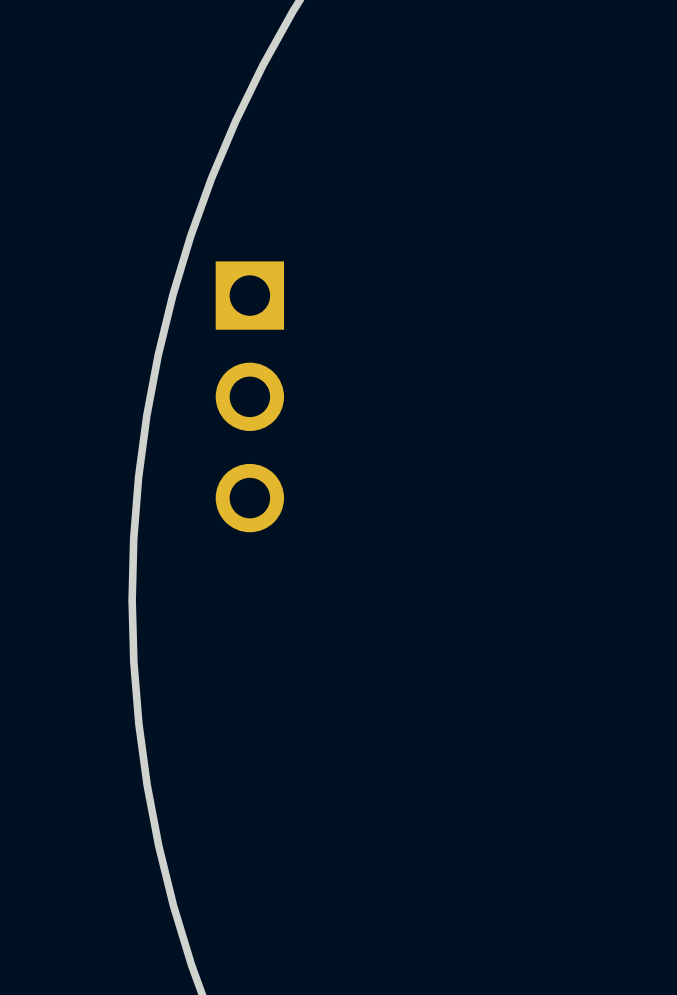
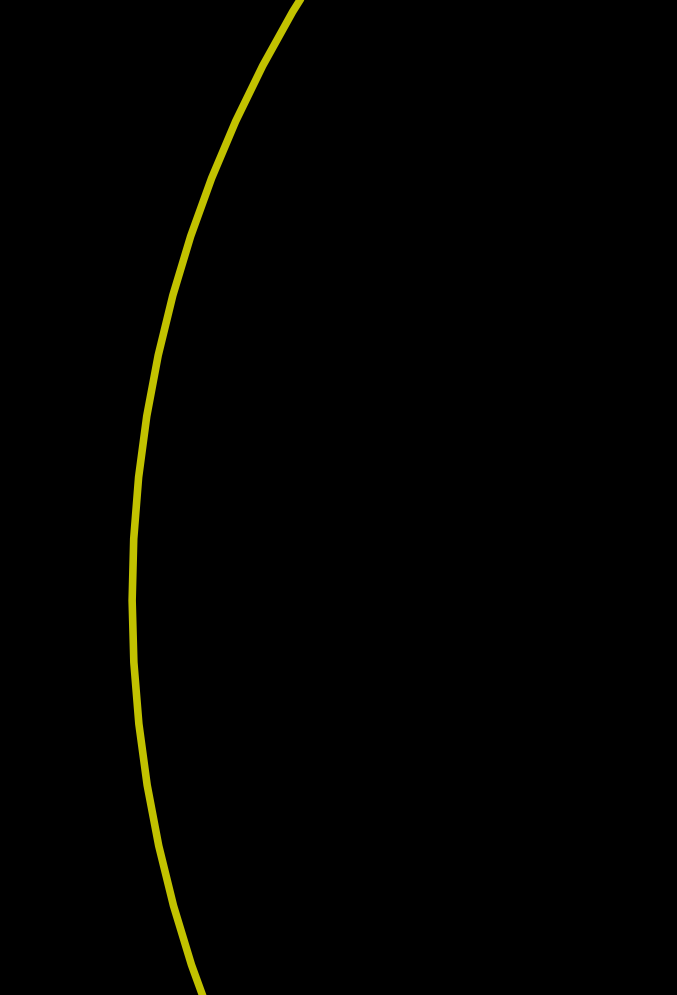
part: (249, 396) -> none

